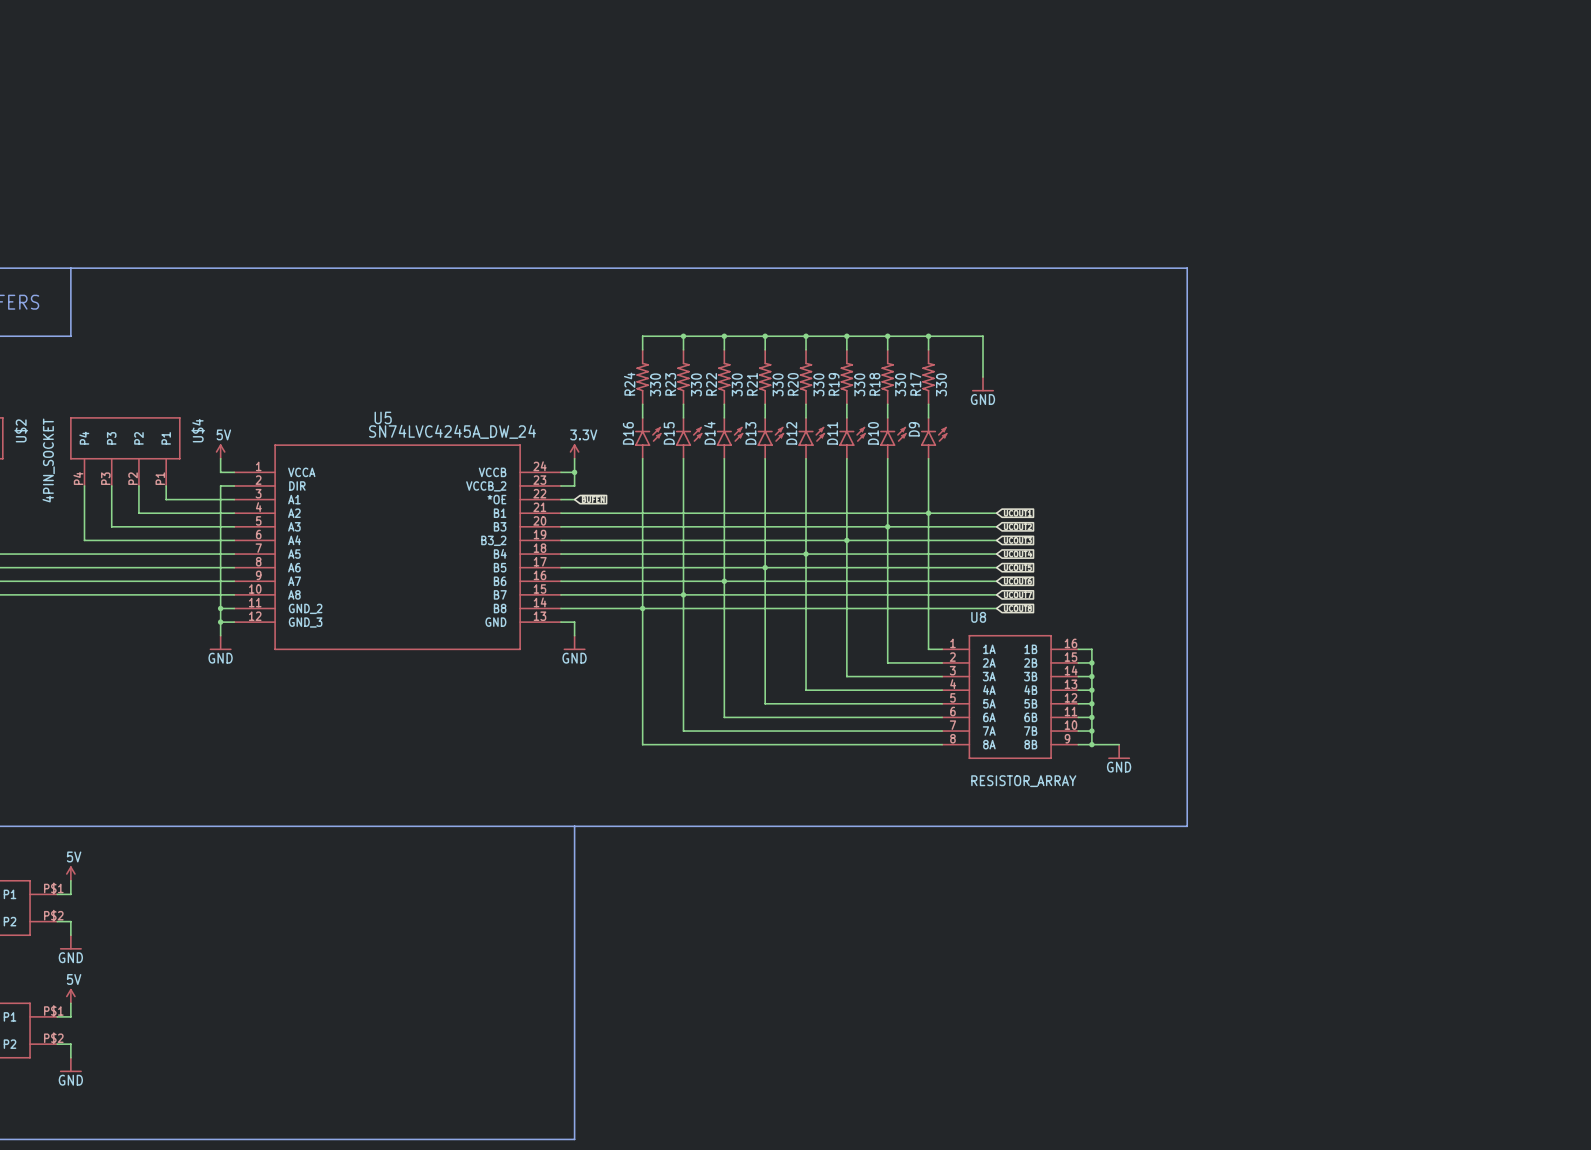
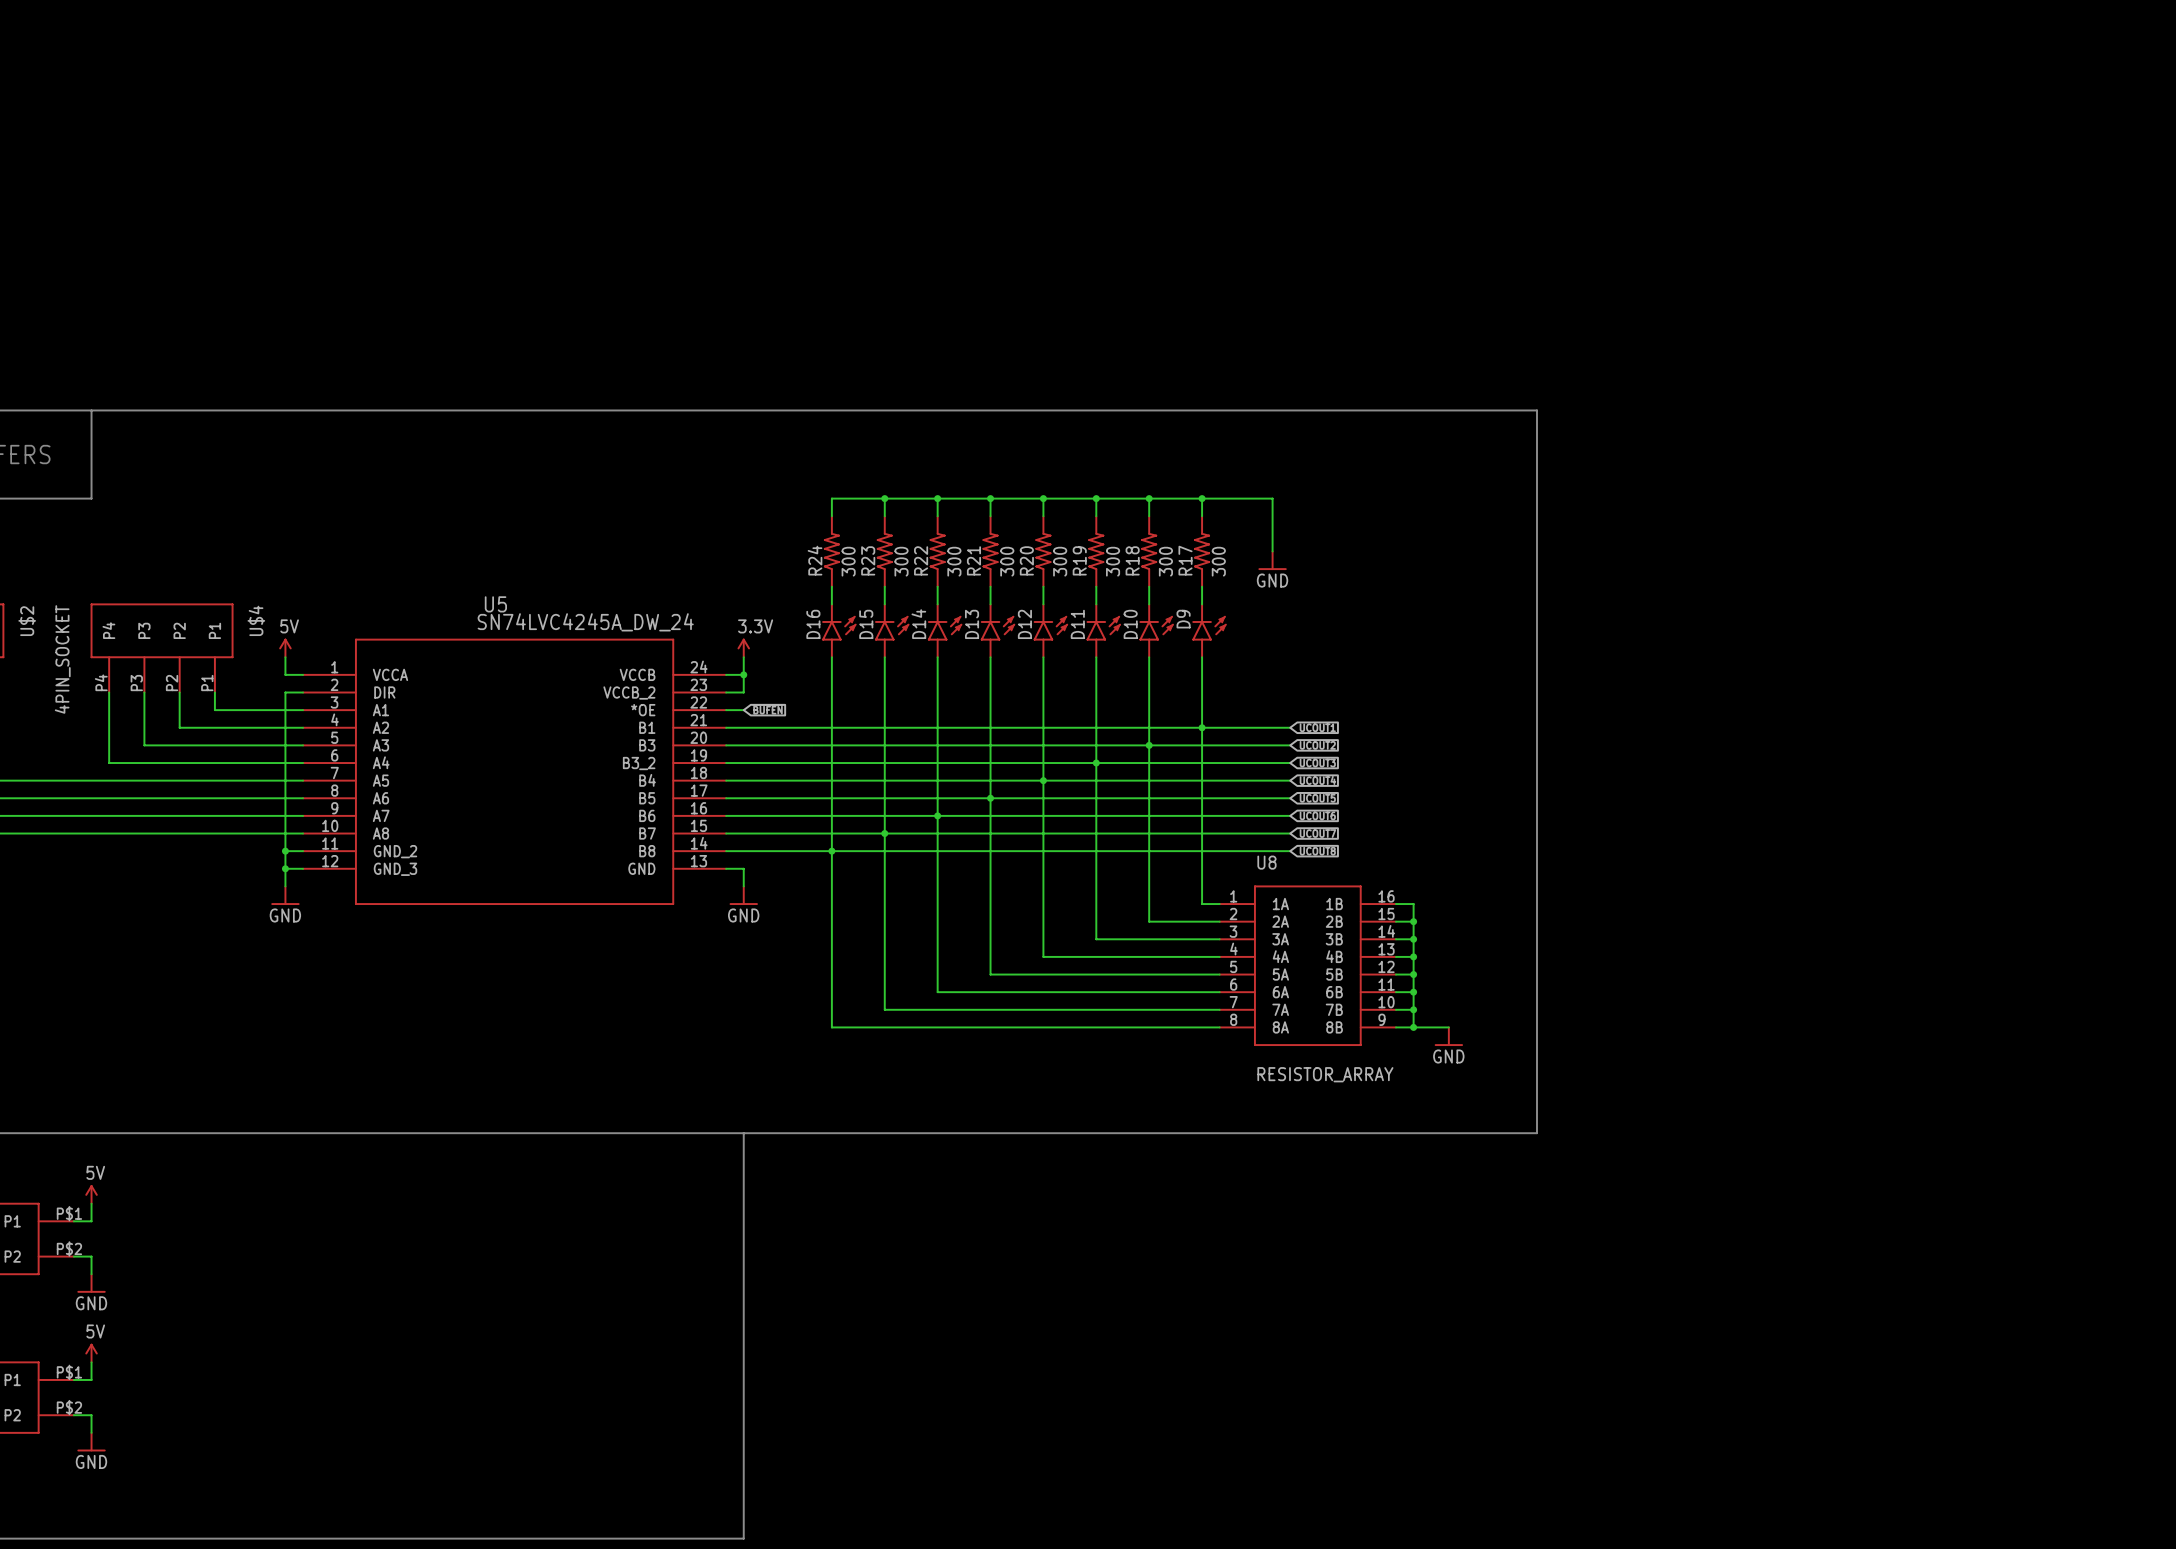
R24 value: 330 (655, 384) -> 300 (848, 561)
R23 value: 330 (696, 384) -> 300 (901, 561)
R22 value: 330 (737, 384) -> 300 (954, 561)
R21 value: 330 (778, 384) -> 300 (1007, 561)
R20 value: 330 (818, 384) -> 300 (1060, 561)
R19 value: 330 (859, 384) -> 300 (1113, 561)
R18 value: 330 (900, 384) -> 300 (1165, 561)
R17 value: 330 (941, 384) -> 300 (1218, 561)

